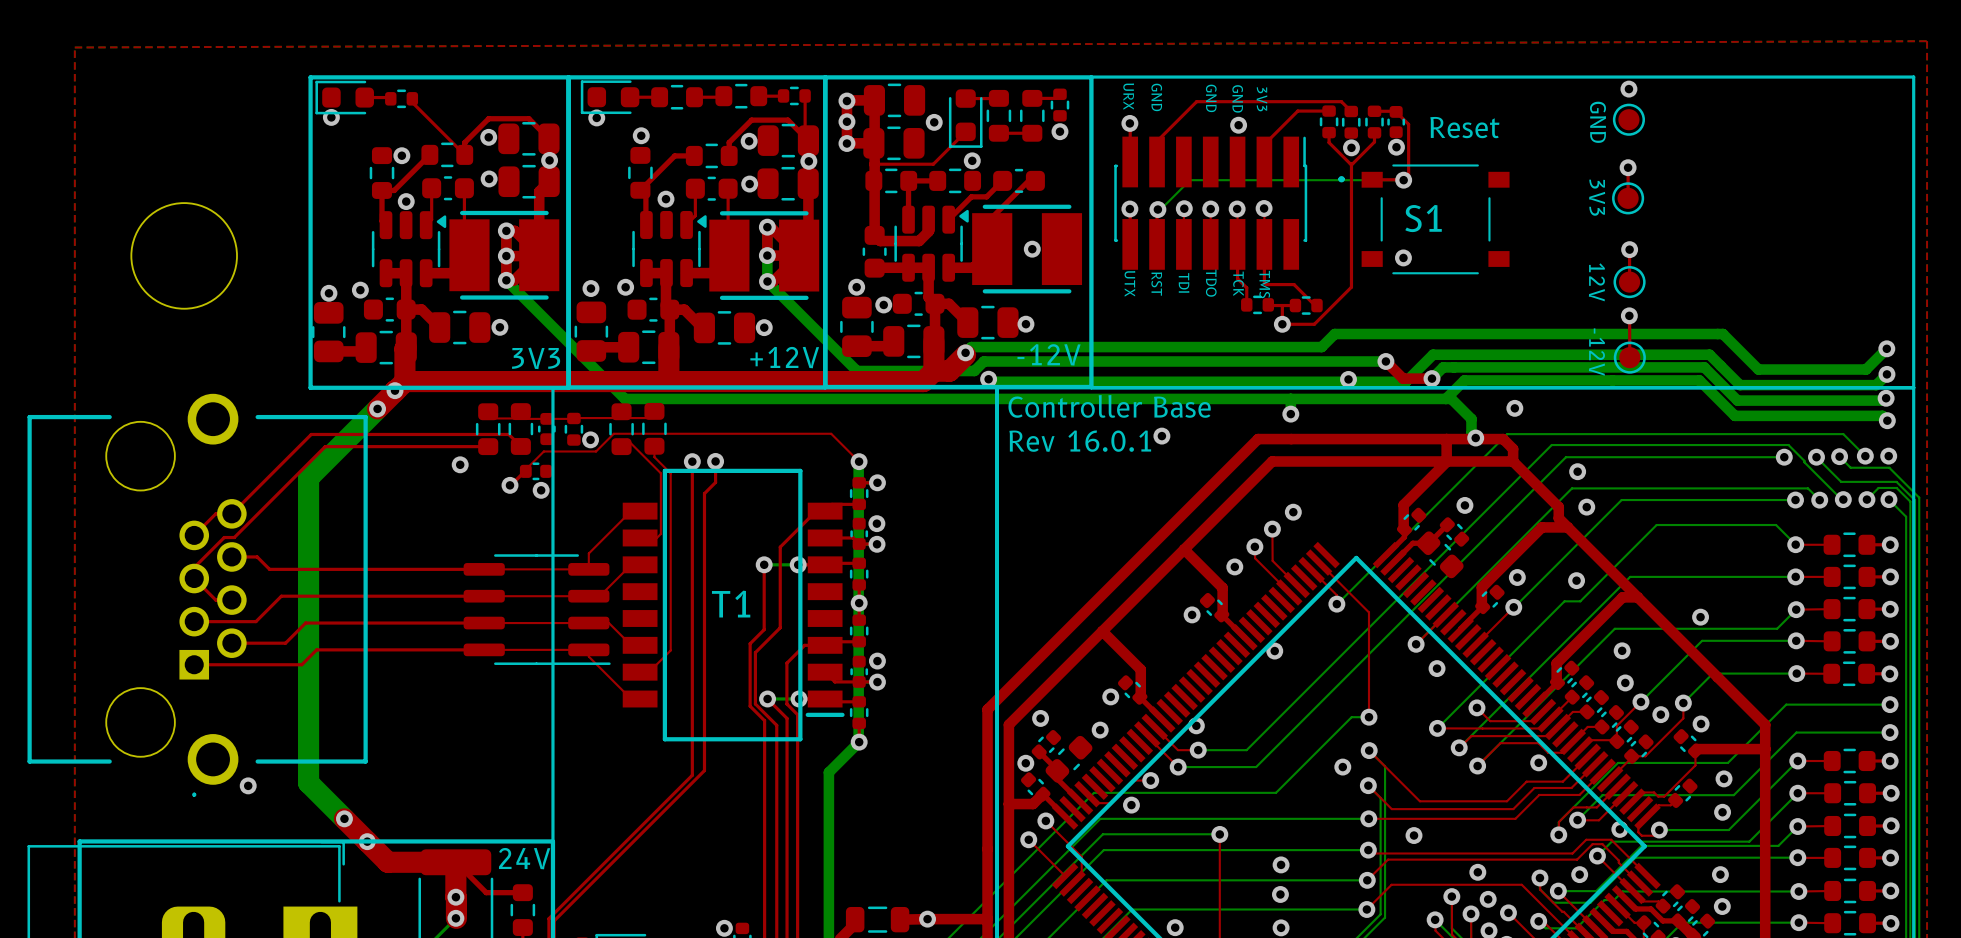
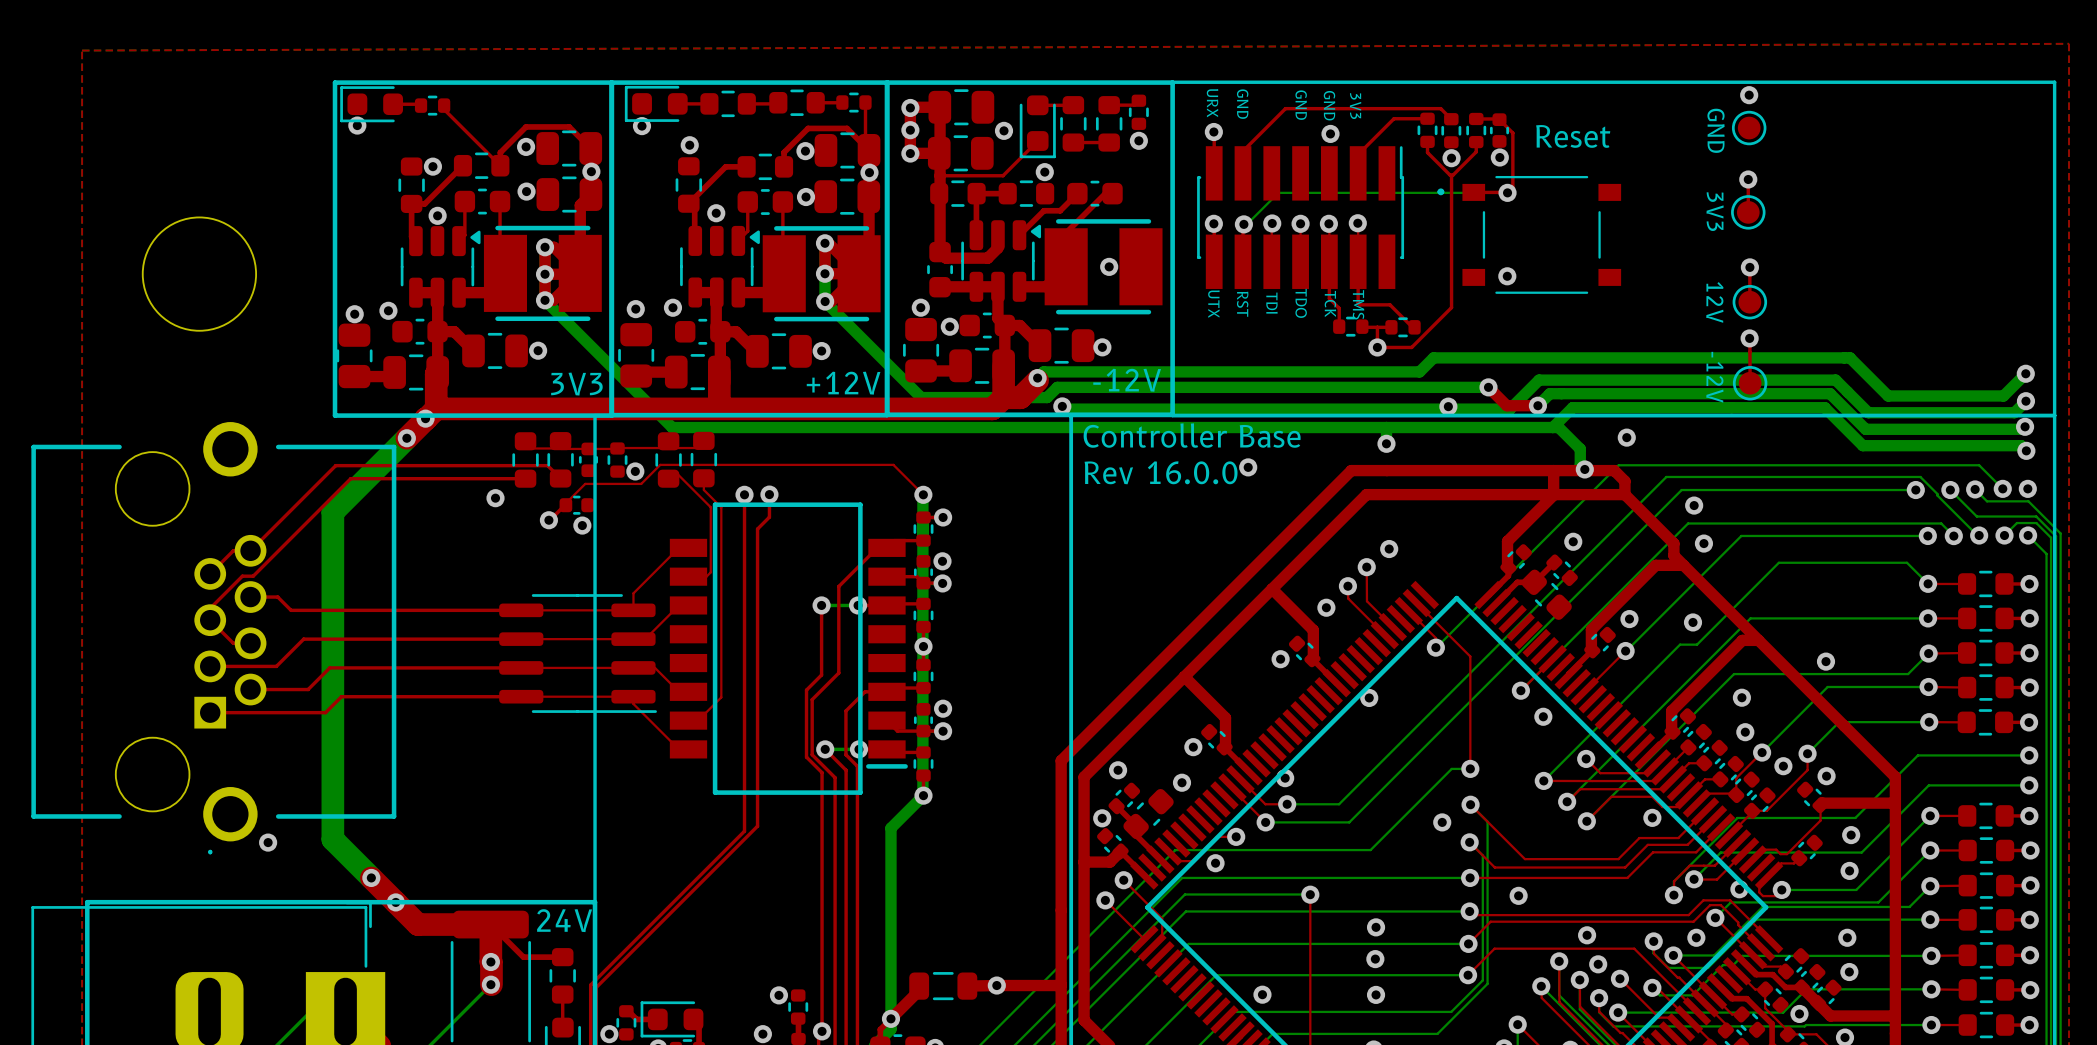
S1 name: S1 (1423, 218) -> none
text: Rev 16.0.1 (1080, 441) -> Rev 16.0.0 (1161, 472)
T1 name: T1 (731, 604) -> none

